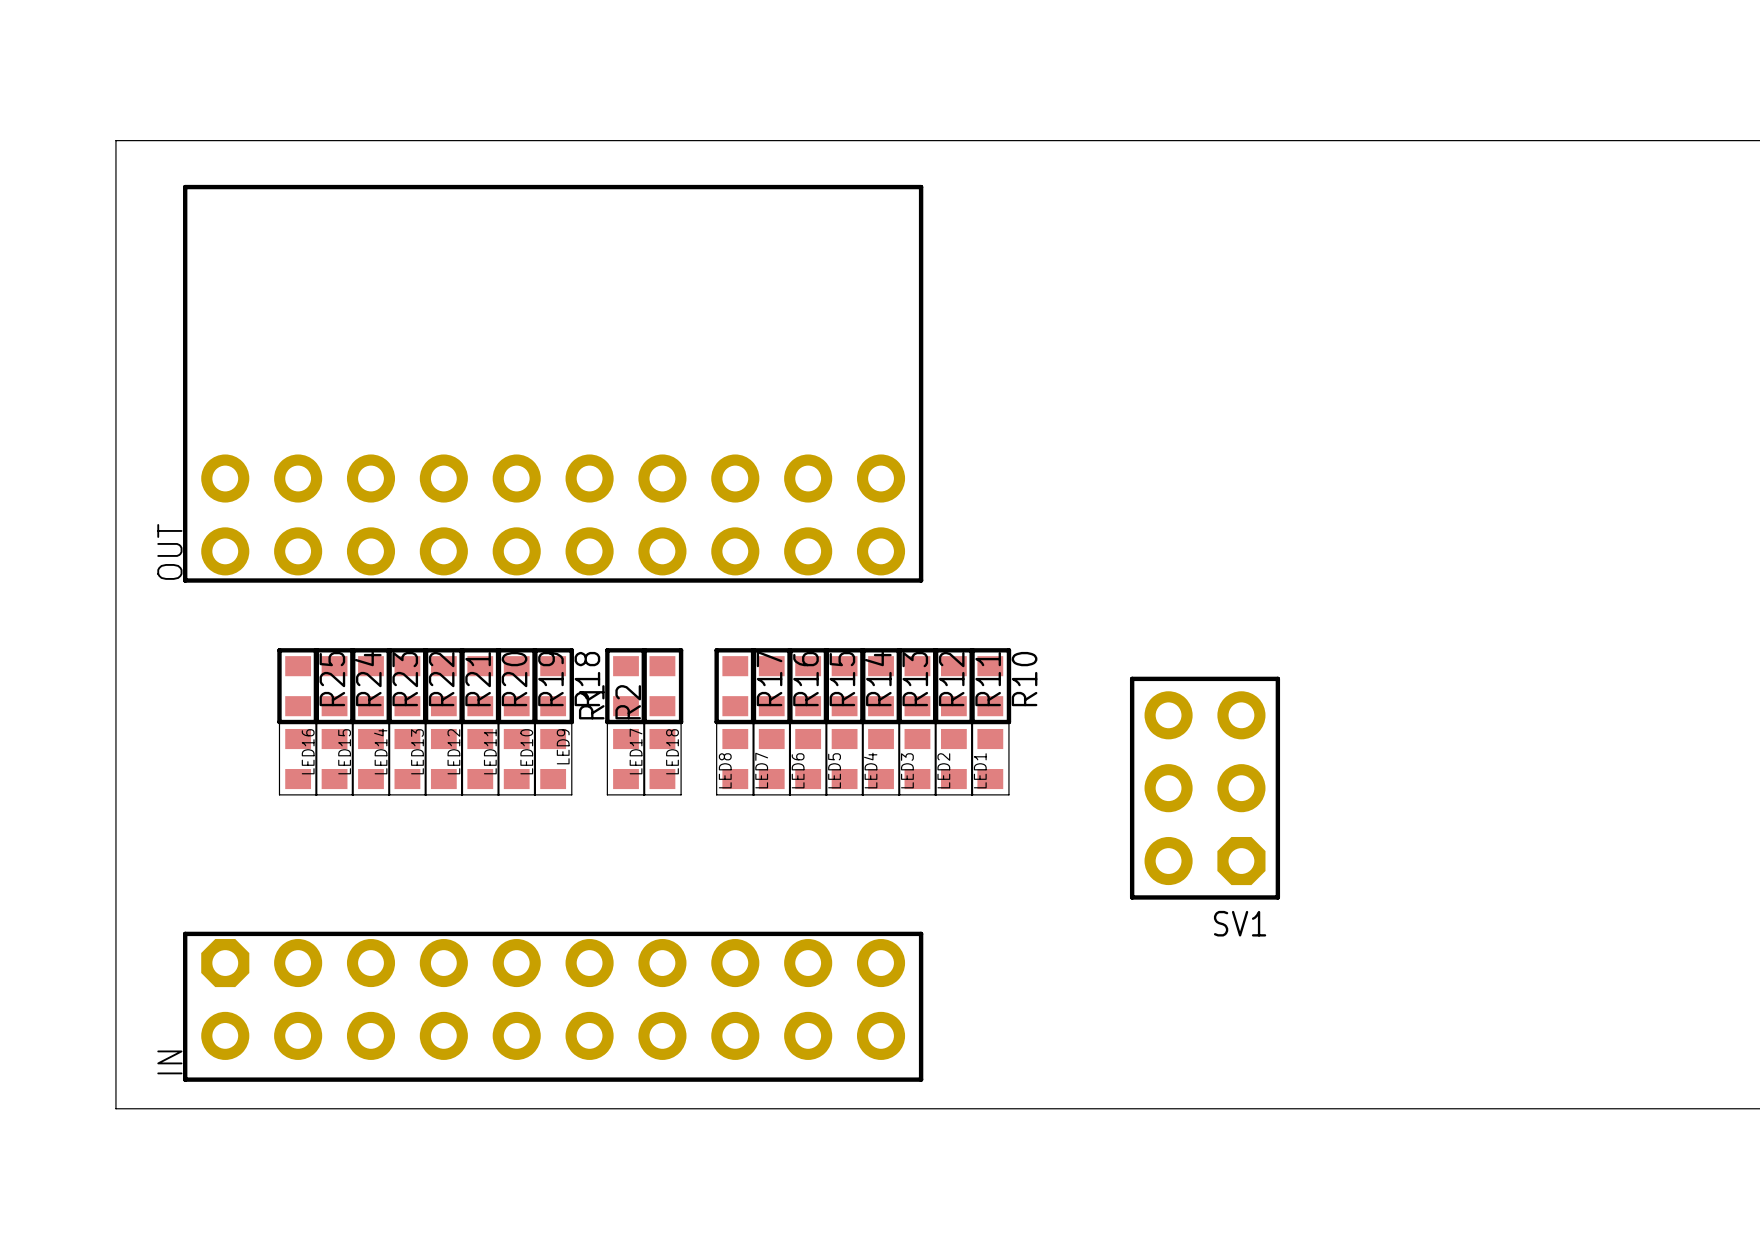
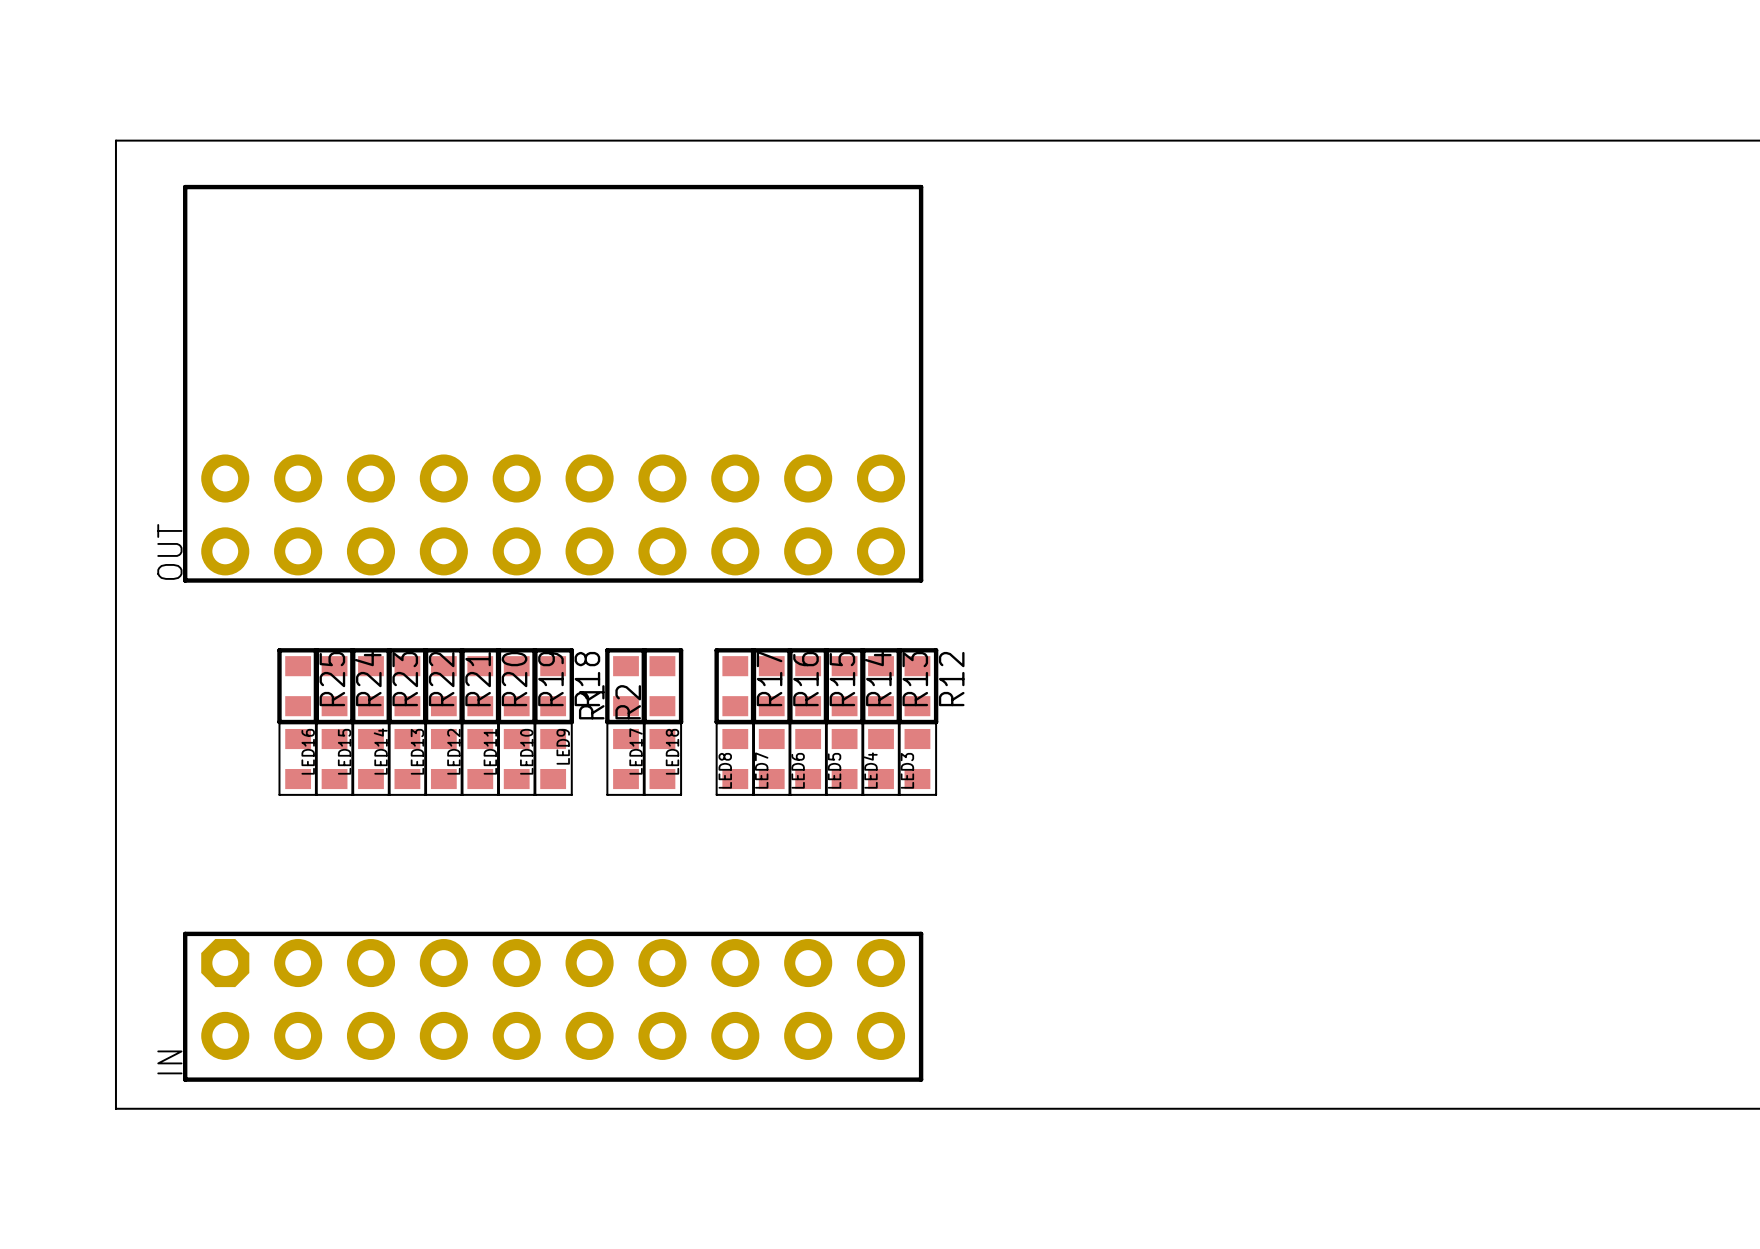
R11: (953, 686) -> none
R10: (990, 686) -> none
LED2: (953, 759) -> none
LED1: (990, 759) -> none
SV1: (1205, 788) -> none

